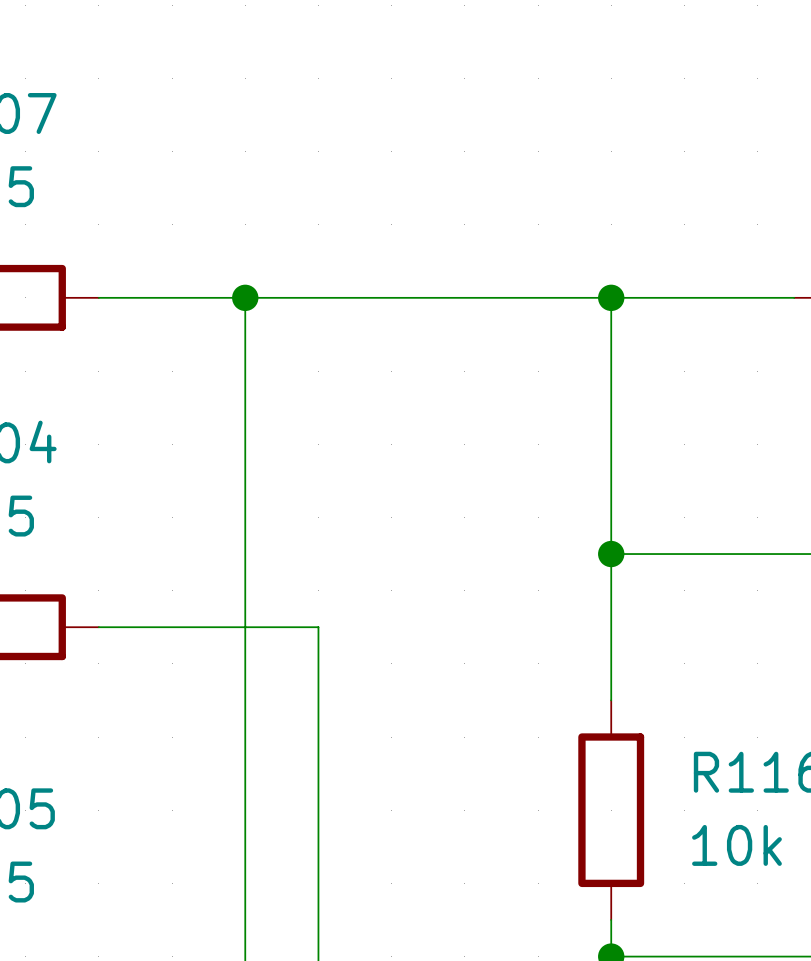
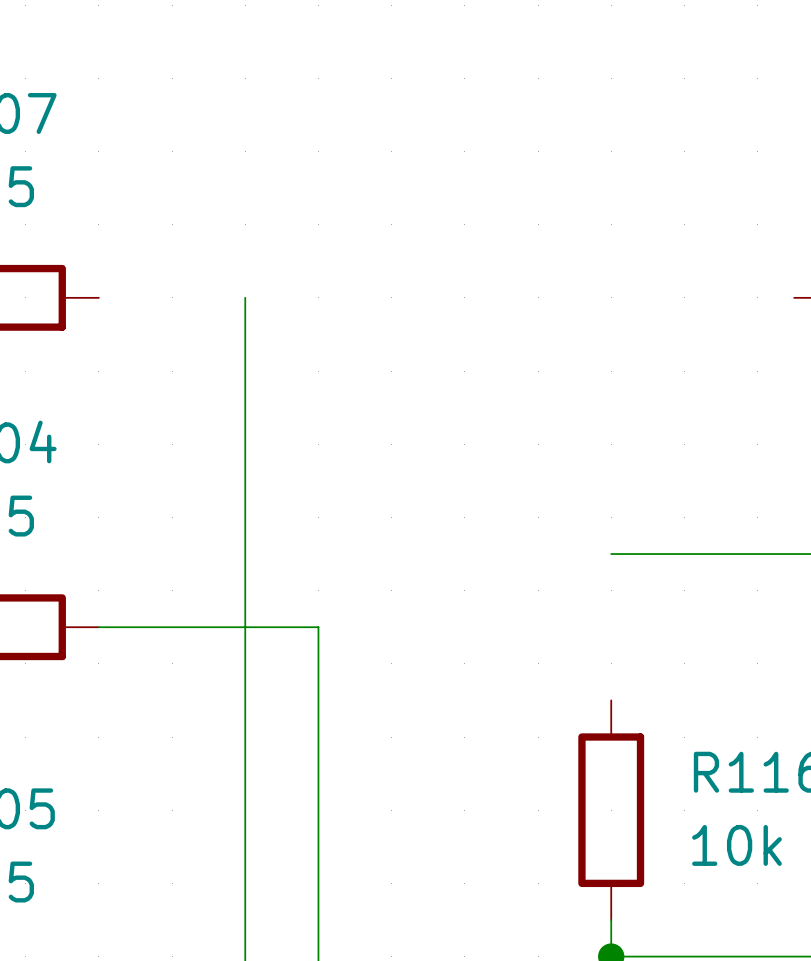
wire: (98, 297) (794, 297) -> none
junction: (245, 297) -> none
wire: (611, 297) (611, 700) -> none
junction: (611, 297) -> none
junction: (611, 554) -> none

